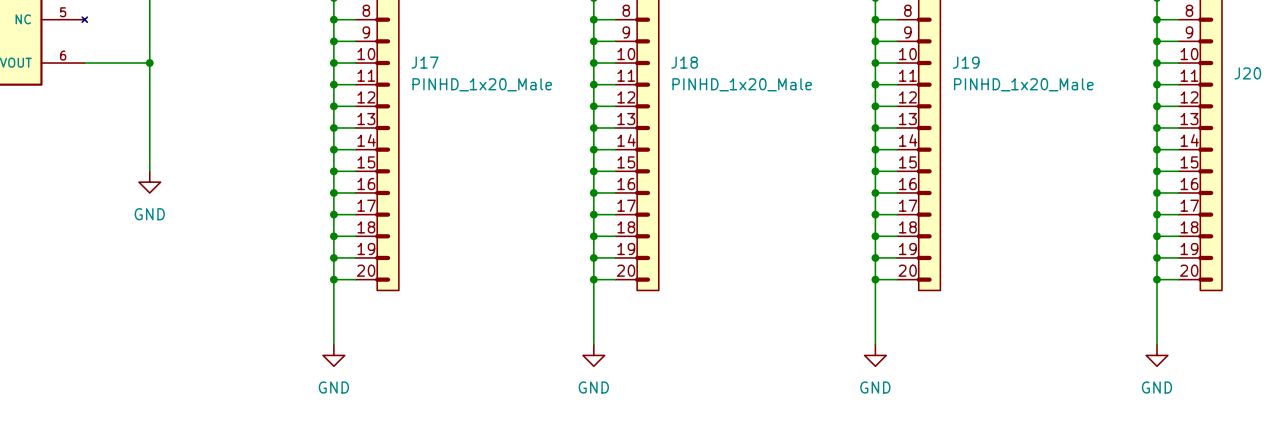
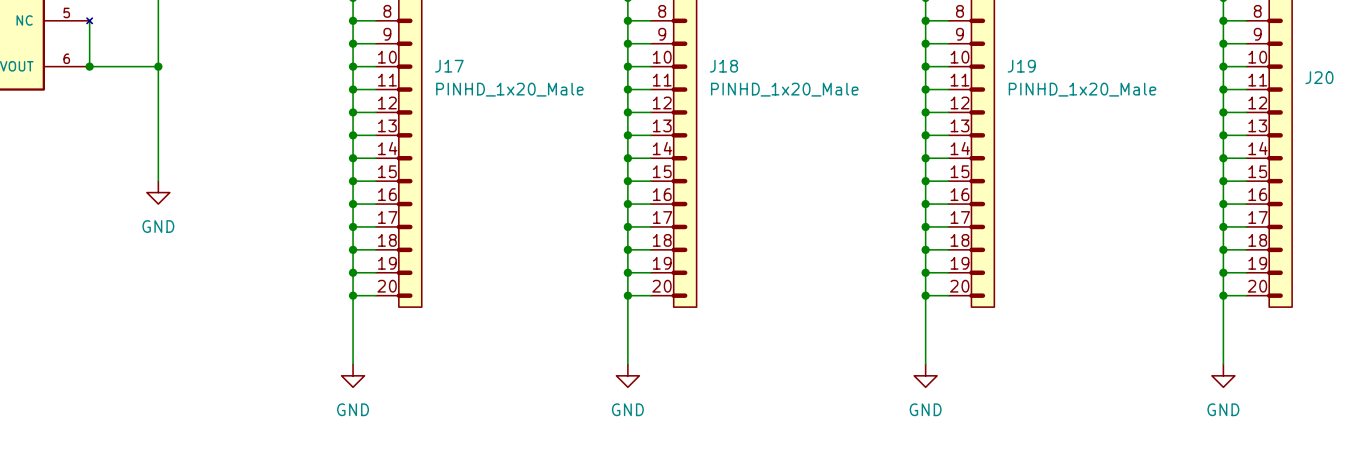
wire: none -> (89, 20) (89, 66)
junction: none -> (89, 66)

